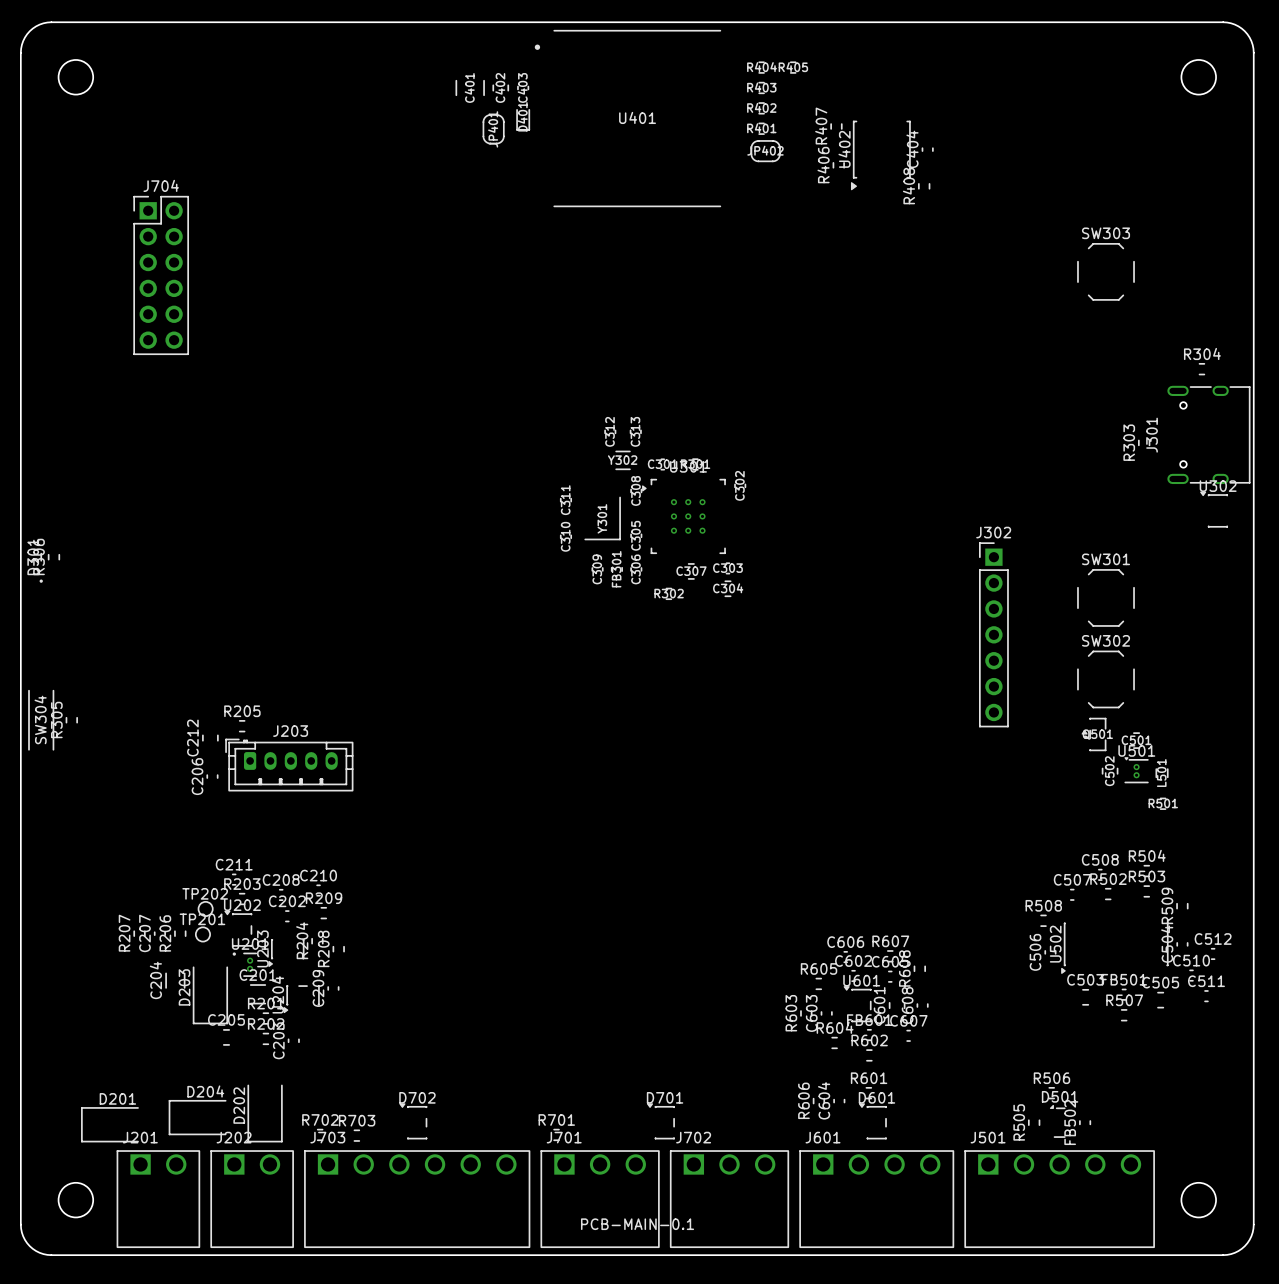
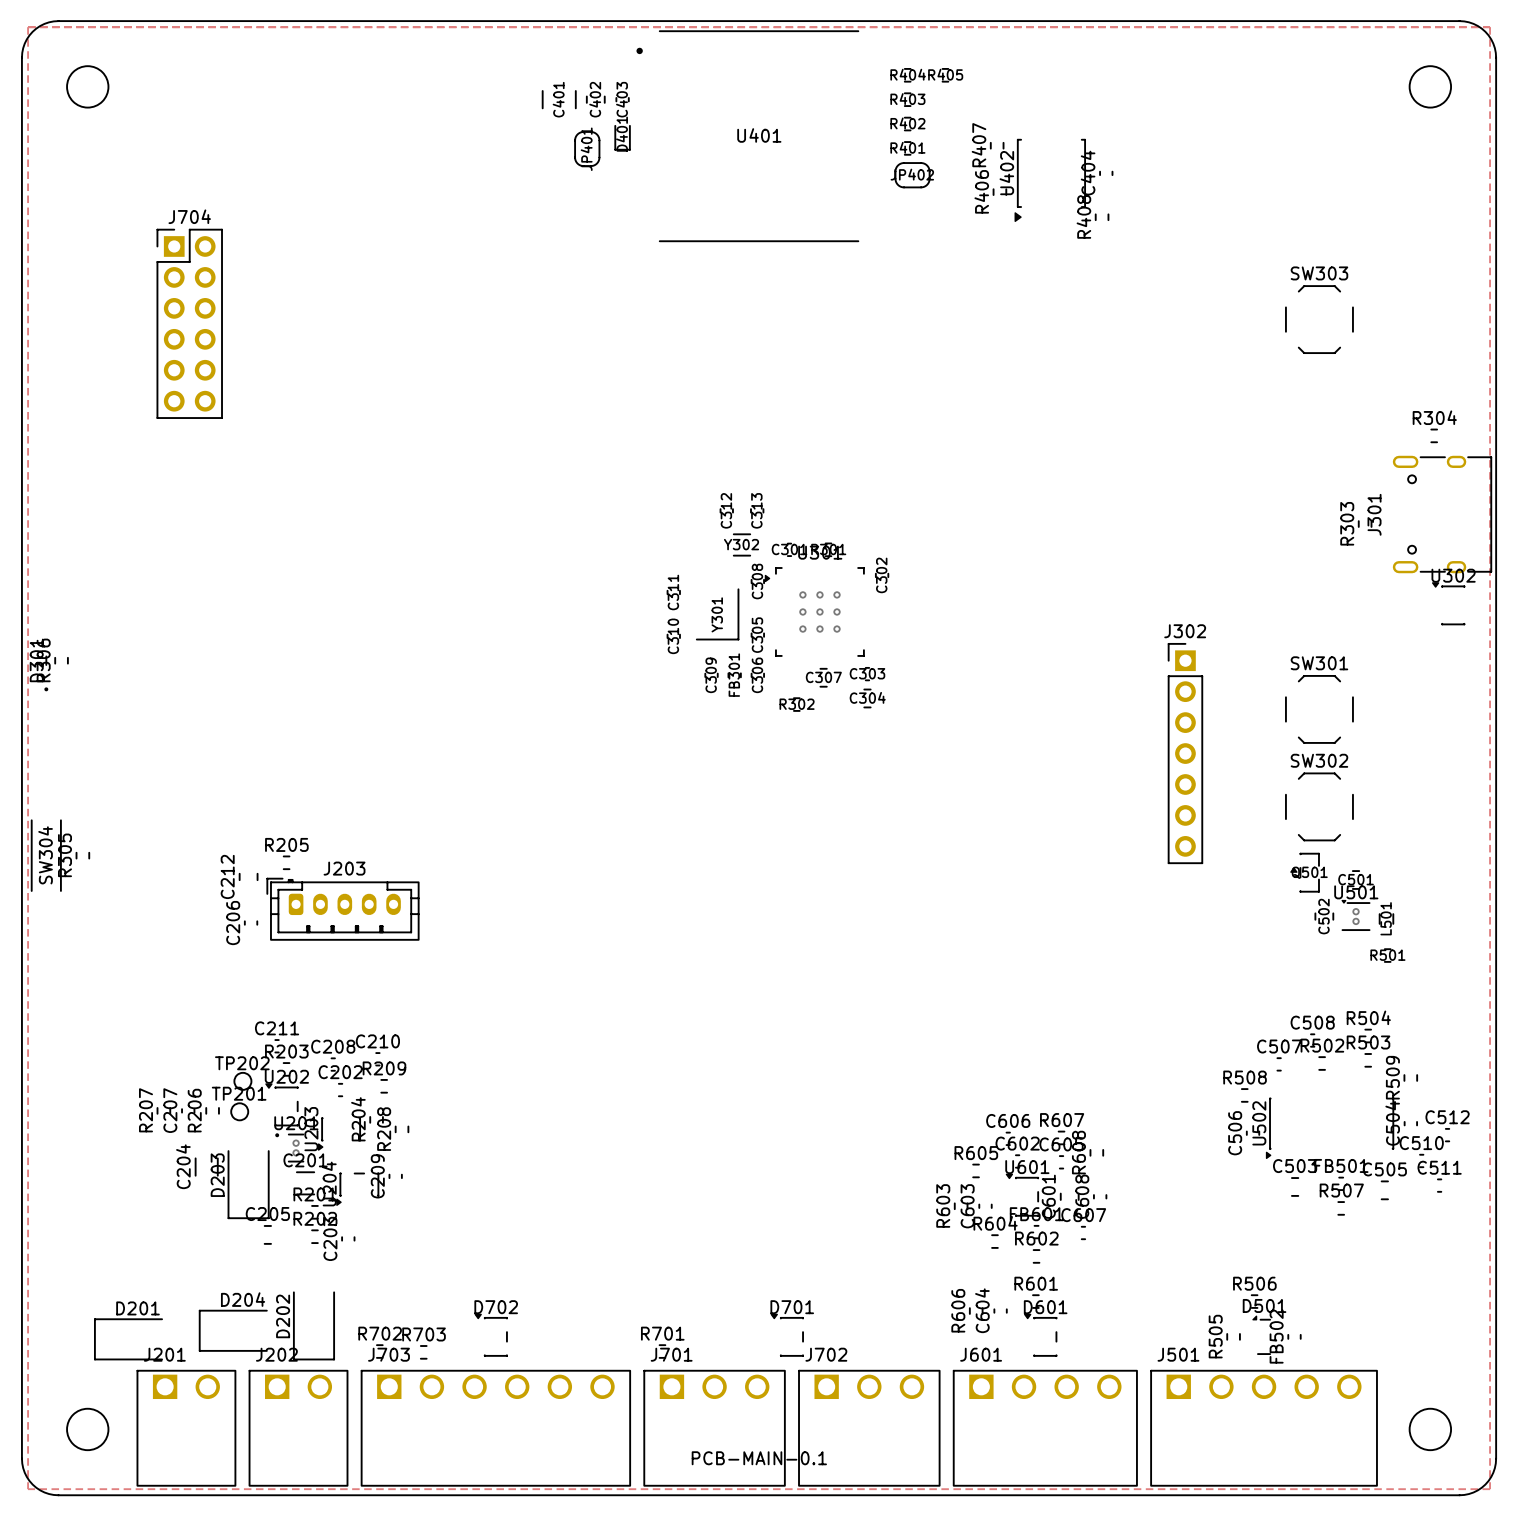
zone outline: none -> (28, 27) (1490, 27) (1490, 1489) (28, 1489) (28, 27)

